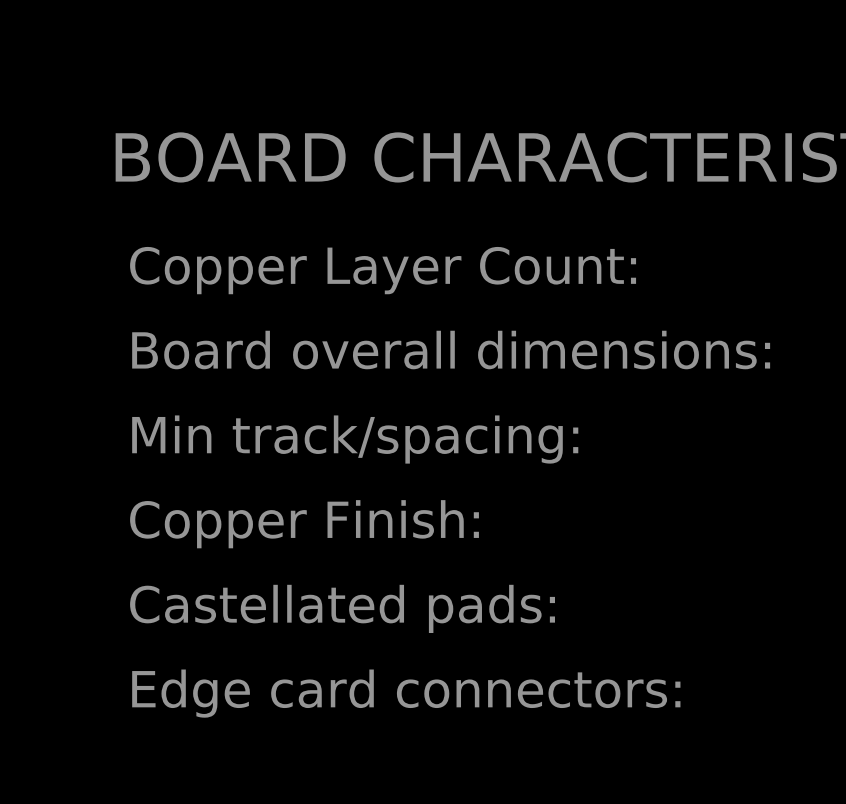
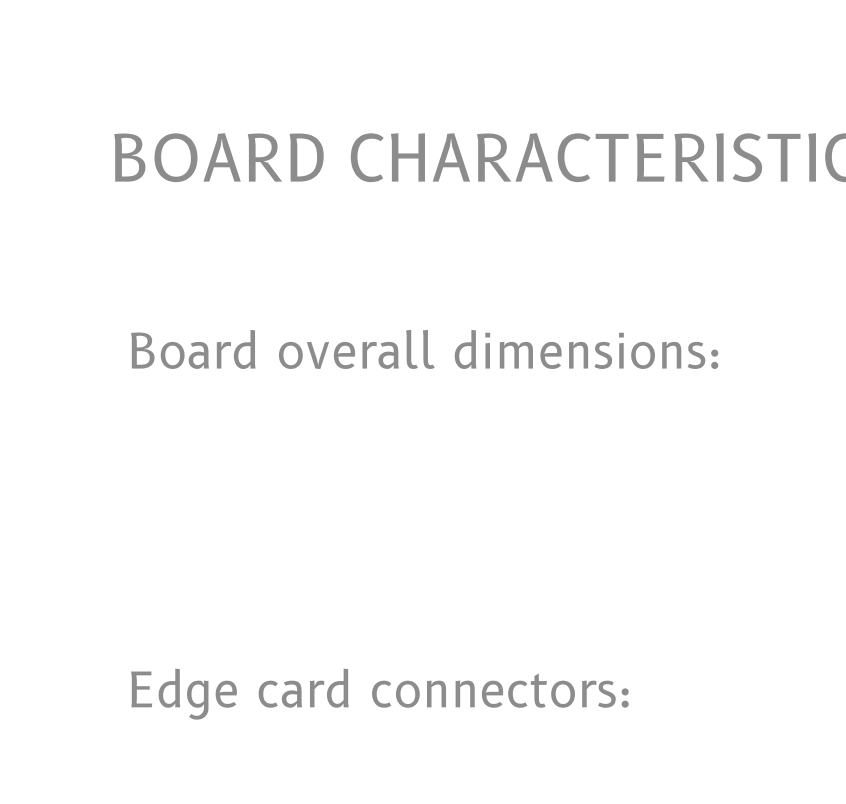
text: Copper Layer Count: (383, 270) -> none
text: Min track/spacing: (355, 439) -> none
text: Copper Finish: (304, 524) -> none
text: Castellated pads: (342, 608) -> none

